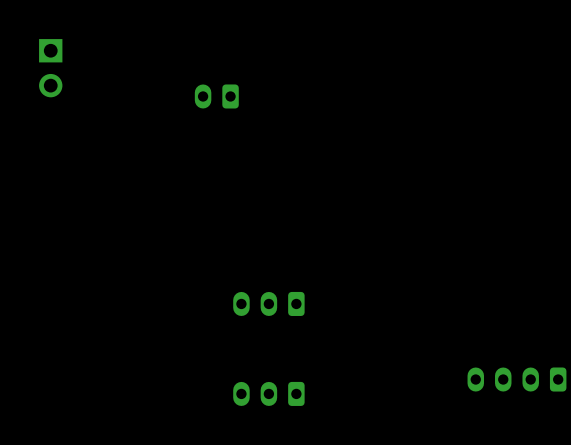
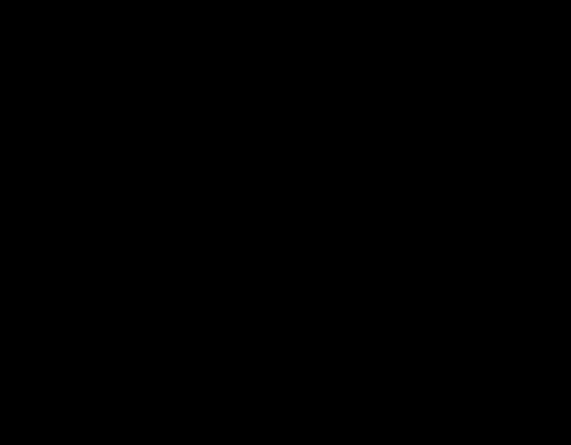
part: (50, 68) -> none
part: (216, 96) -> none
part: (268, 303) -> none
part: (516, 379) -> none
part: (268, 393) -> none

